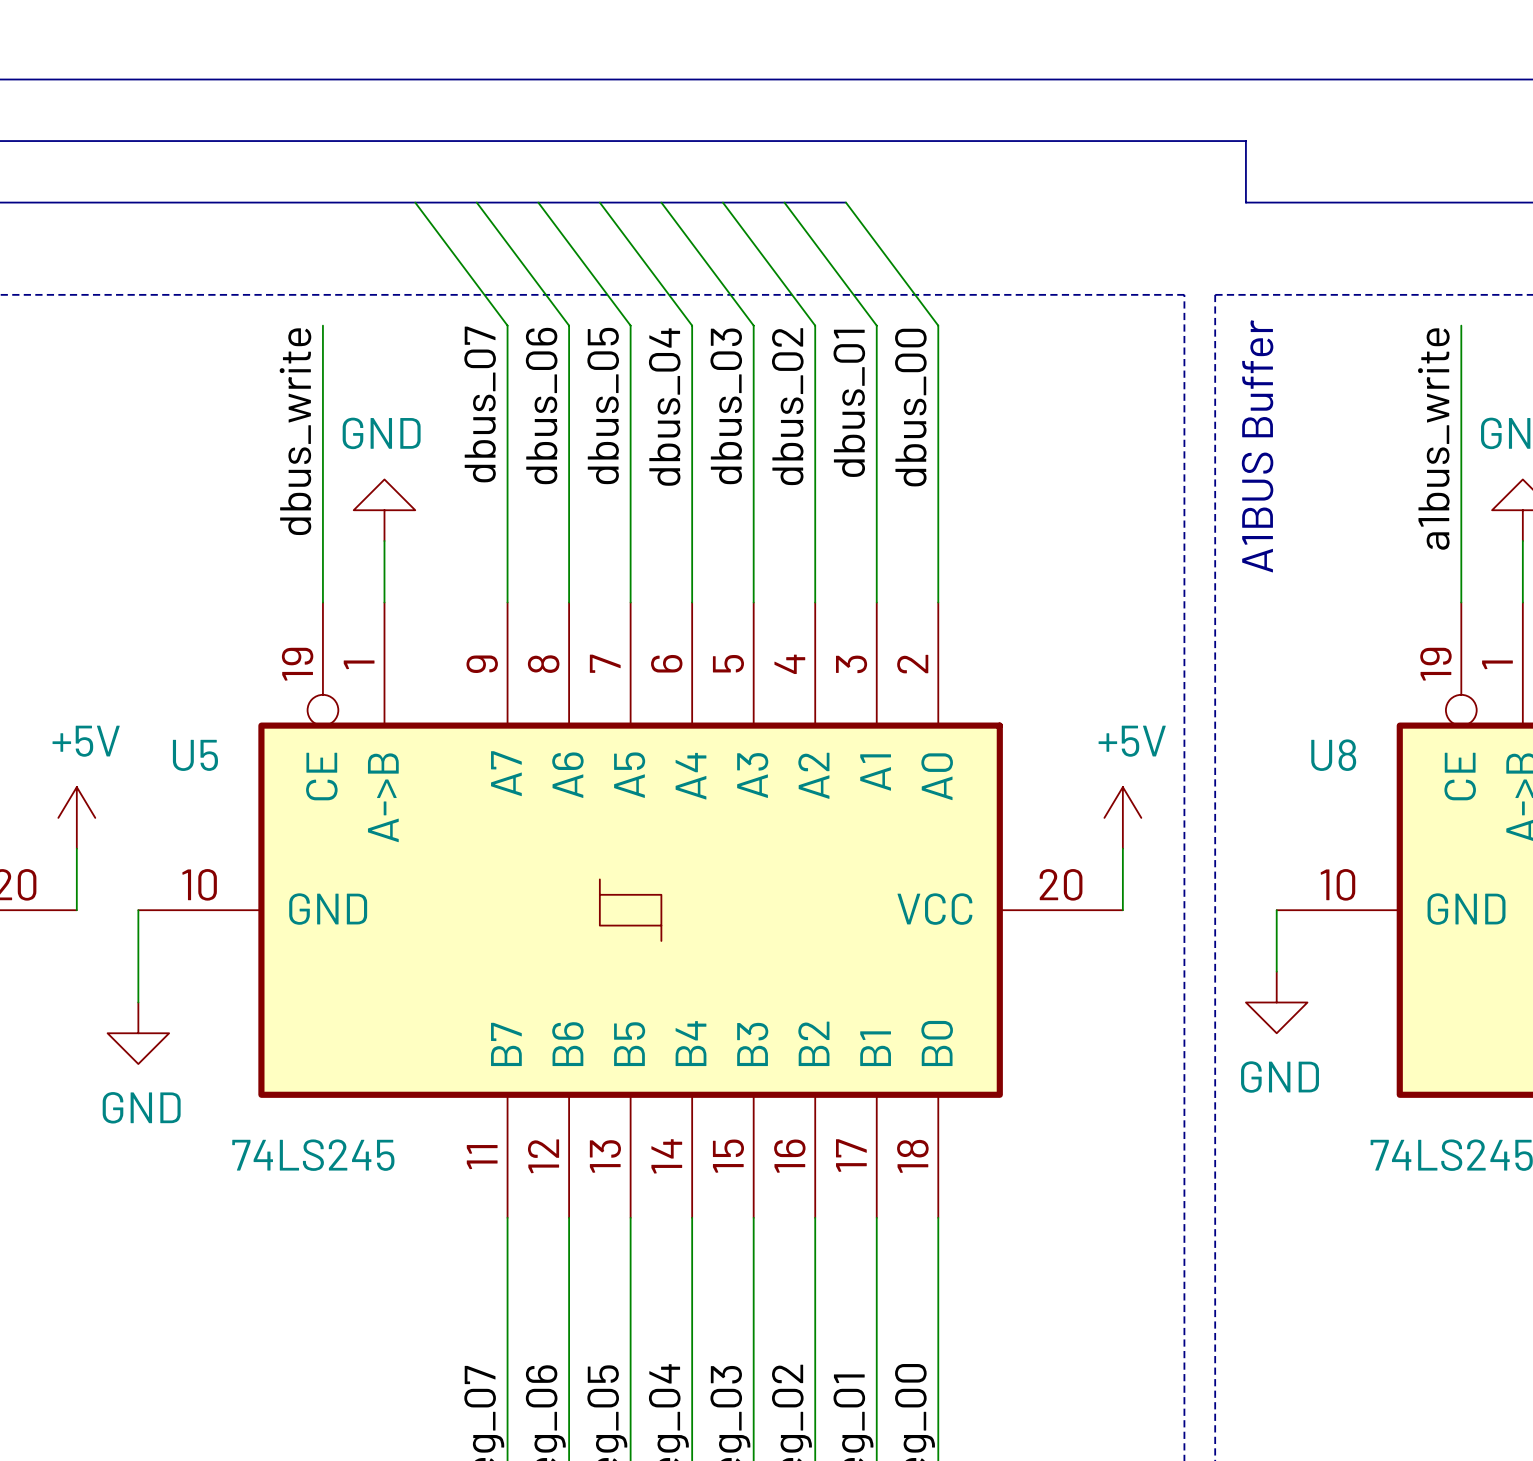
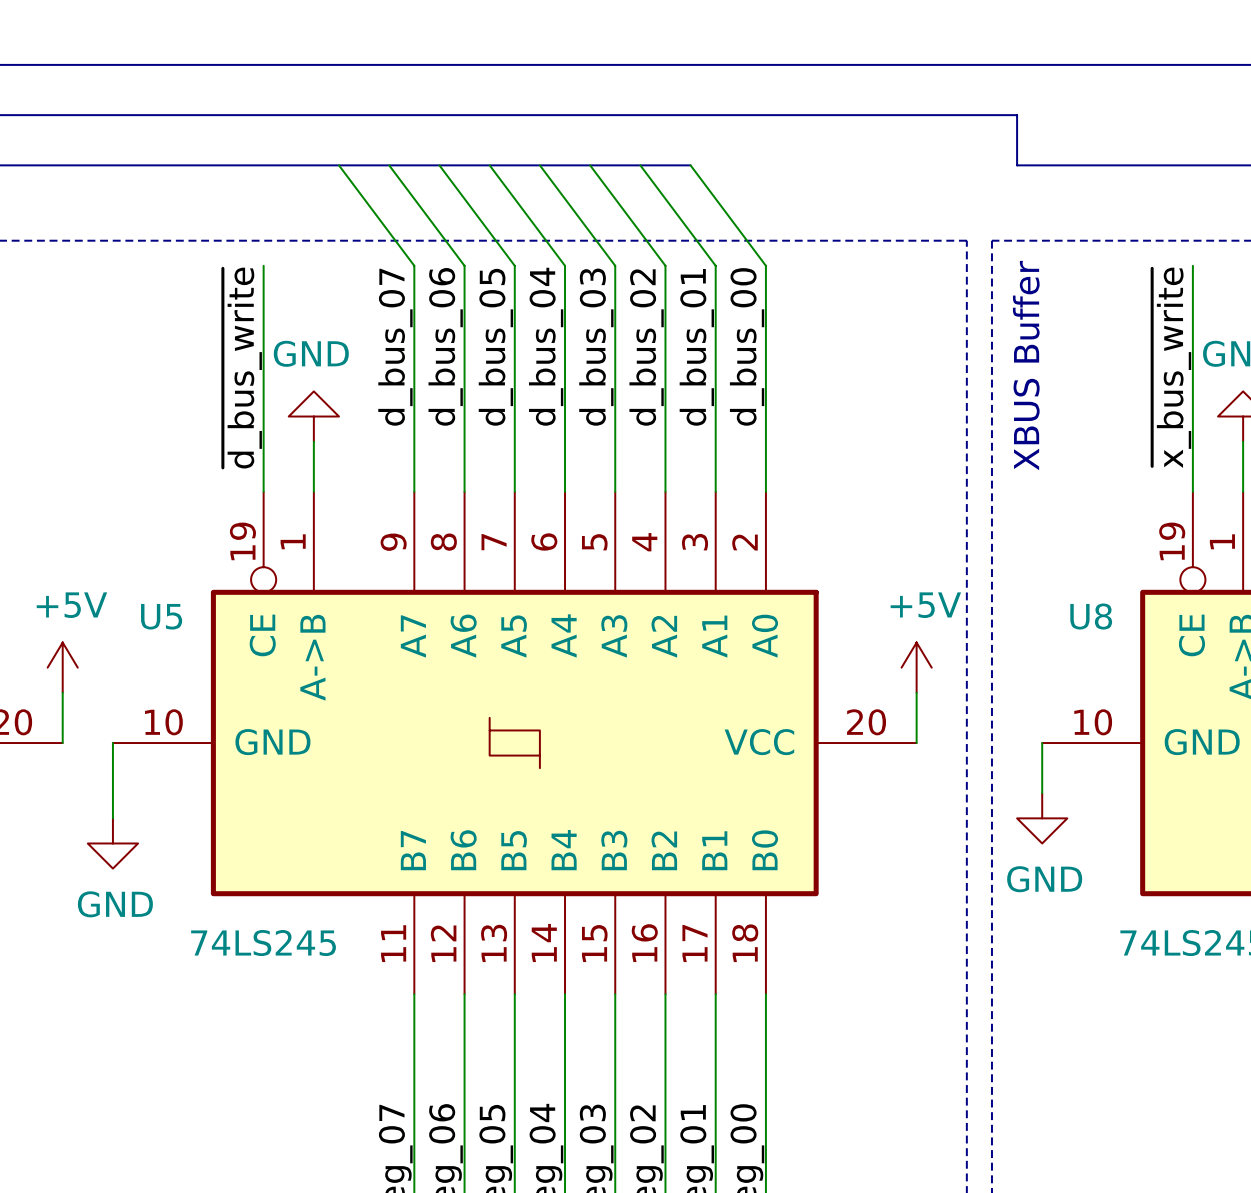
label: dbus_01 (849, 403) -> d_bus_01 (696, 347)
label: dbus_07 (480, 404) -> d_bus_07 (395, 347)
label: dbus_06 (541, 406) -> d_bus_06 (445, 346)
label: dbus_05 (603, 406) -> d_bus_05 (495, 347)
label: dbus_03 (726, 406) -> d_bus_03 (596, 347)
label: dbus_02 (787, 406) -> d_bus_02 (646, 347)
label: dbus_04 (664, 407) -> d_bus_04 (546, 346)
label: dbus_00 (910, 407) -> d_bus_00 (747, 346)
label: dbus_write (295, 431) -> ~{d_bus_write} (242, 368)
label: a1bus_write (1433, 439) -> ~{x_bus_write} (1171, 367)
text: A1BUS Buffer (1257, 446) -> XBUS Buffer (1026, 365)

